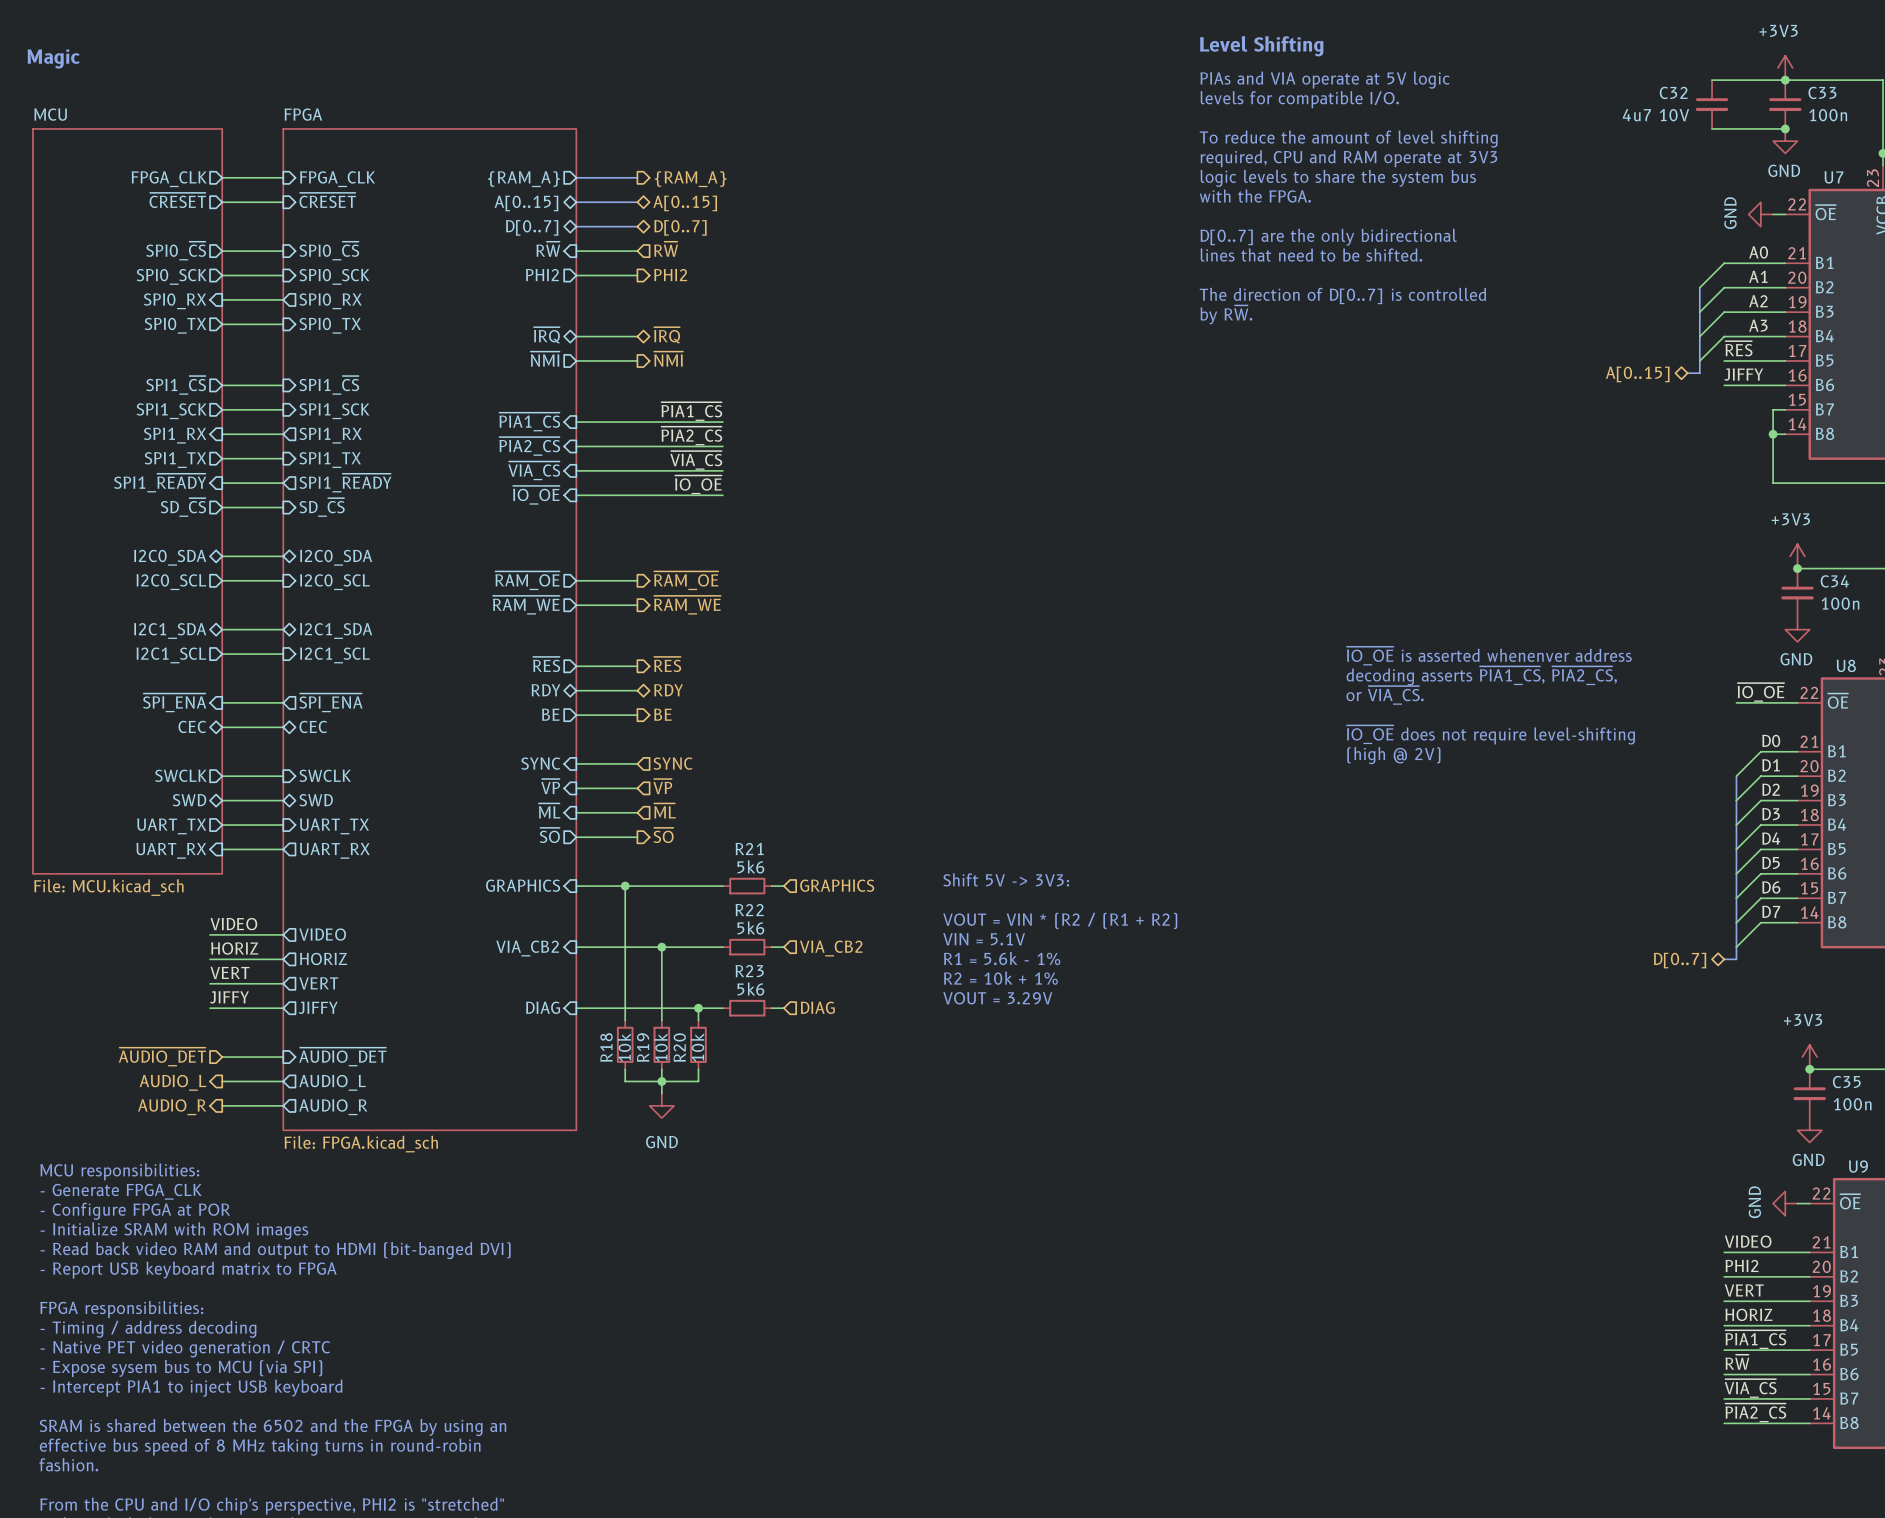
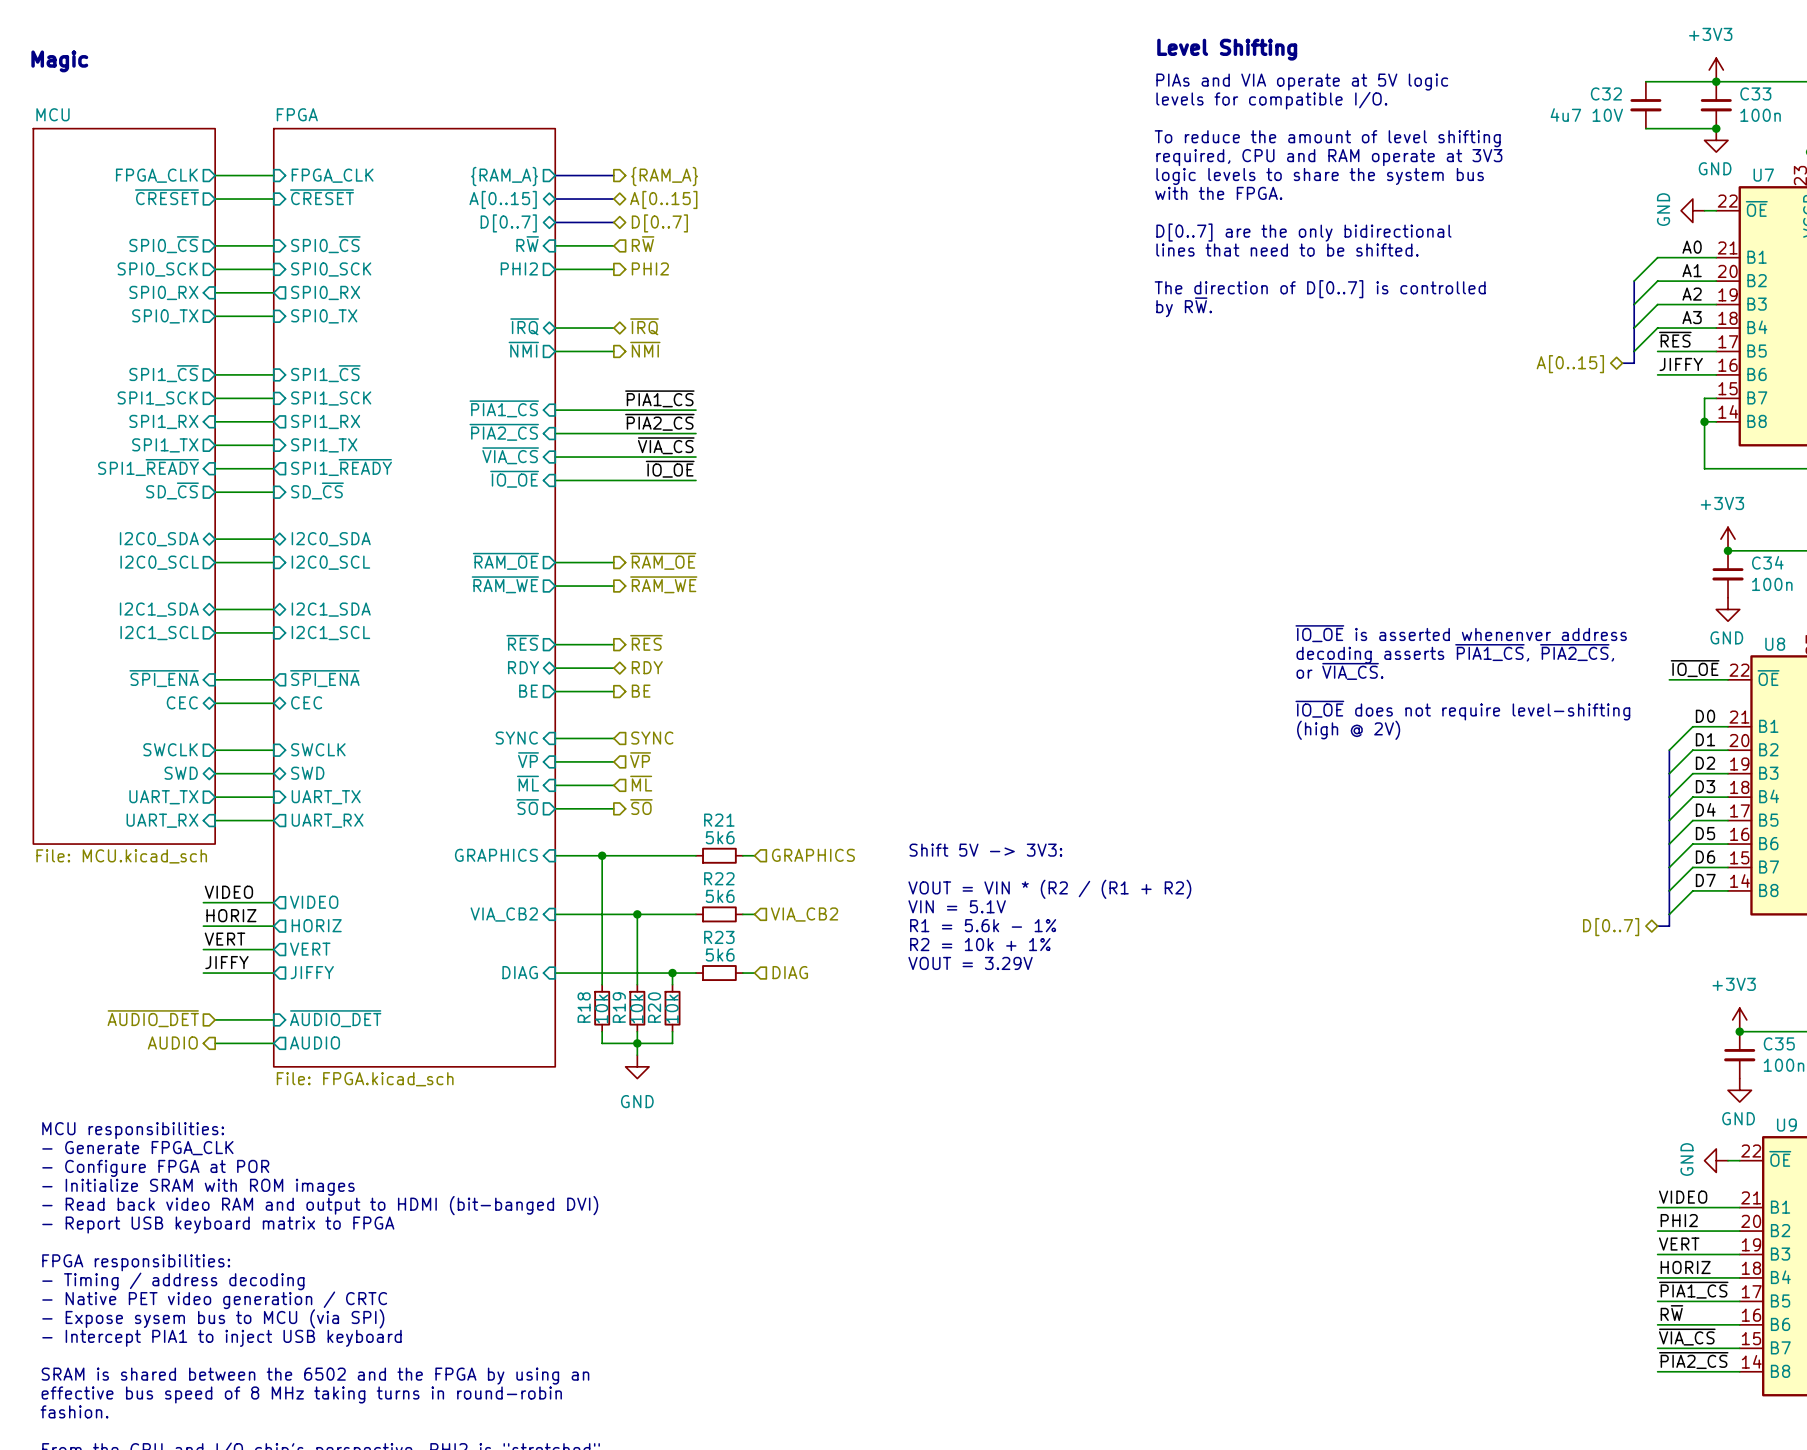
sheet FPGA: none -> File: FPGA.kicad_sch (414, 597)
sheet FPGA: File: FPGA.kicad_sch (429, 629) -> none
hierarchical label: AUDIO_L (172, 1082) -> AUDIO (172, 1042)
sheet pin: AUDIO_L (332, 1082) -> AUDIO (315, 1042)
wire: (222, 1105) (283, 1105) -> none
hierarchical label: AUDIO_R (172, 1107) -> none
sheet pin: AUDIO_R (333, 1107) -> none

